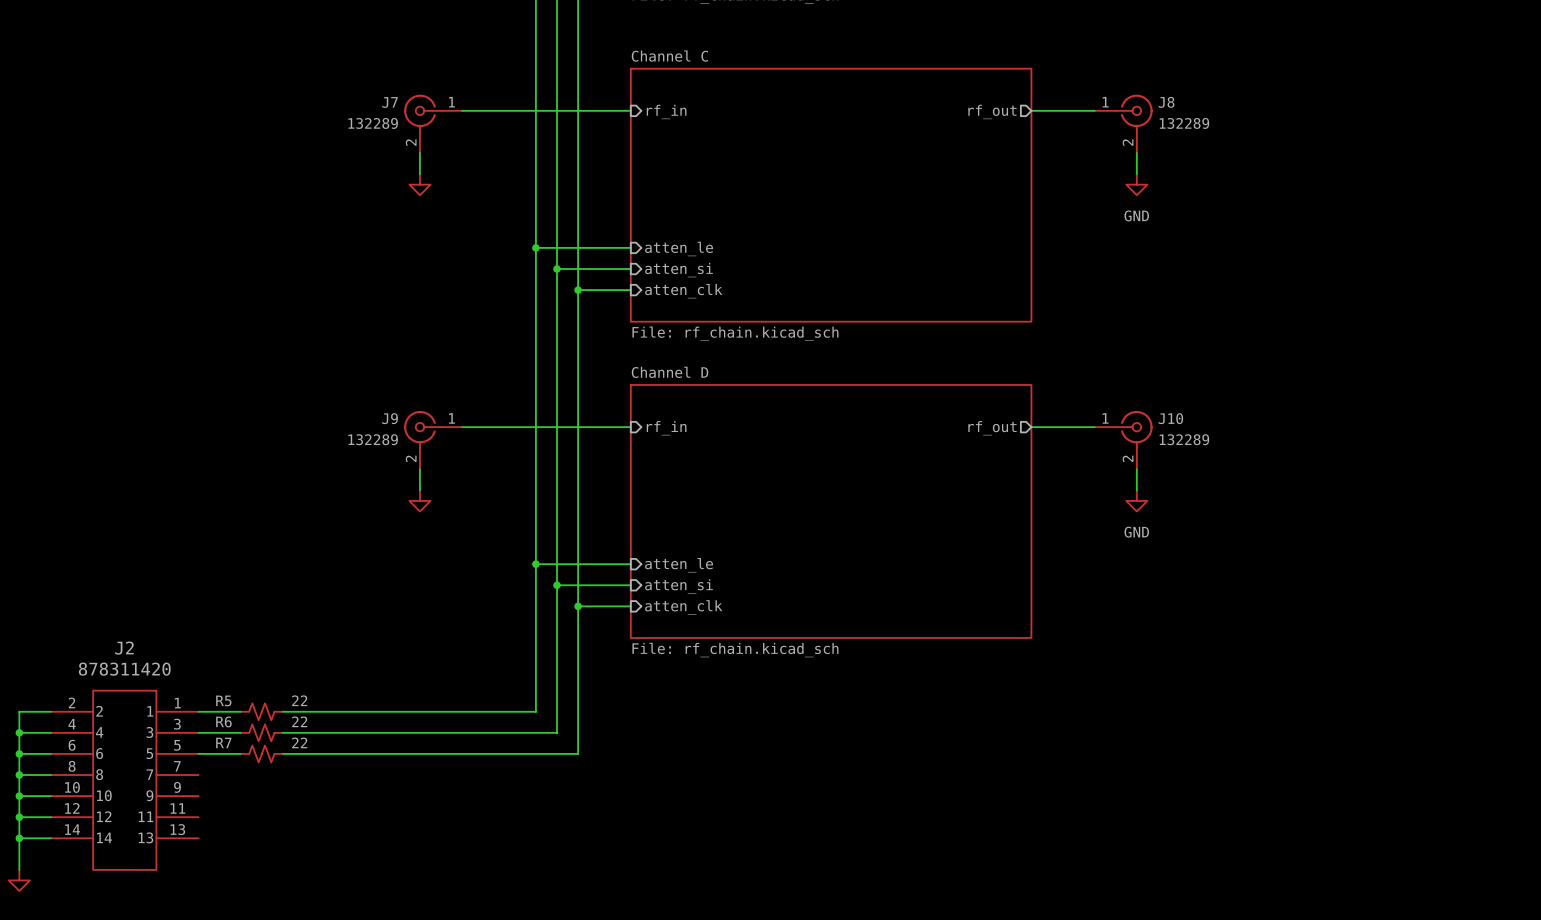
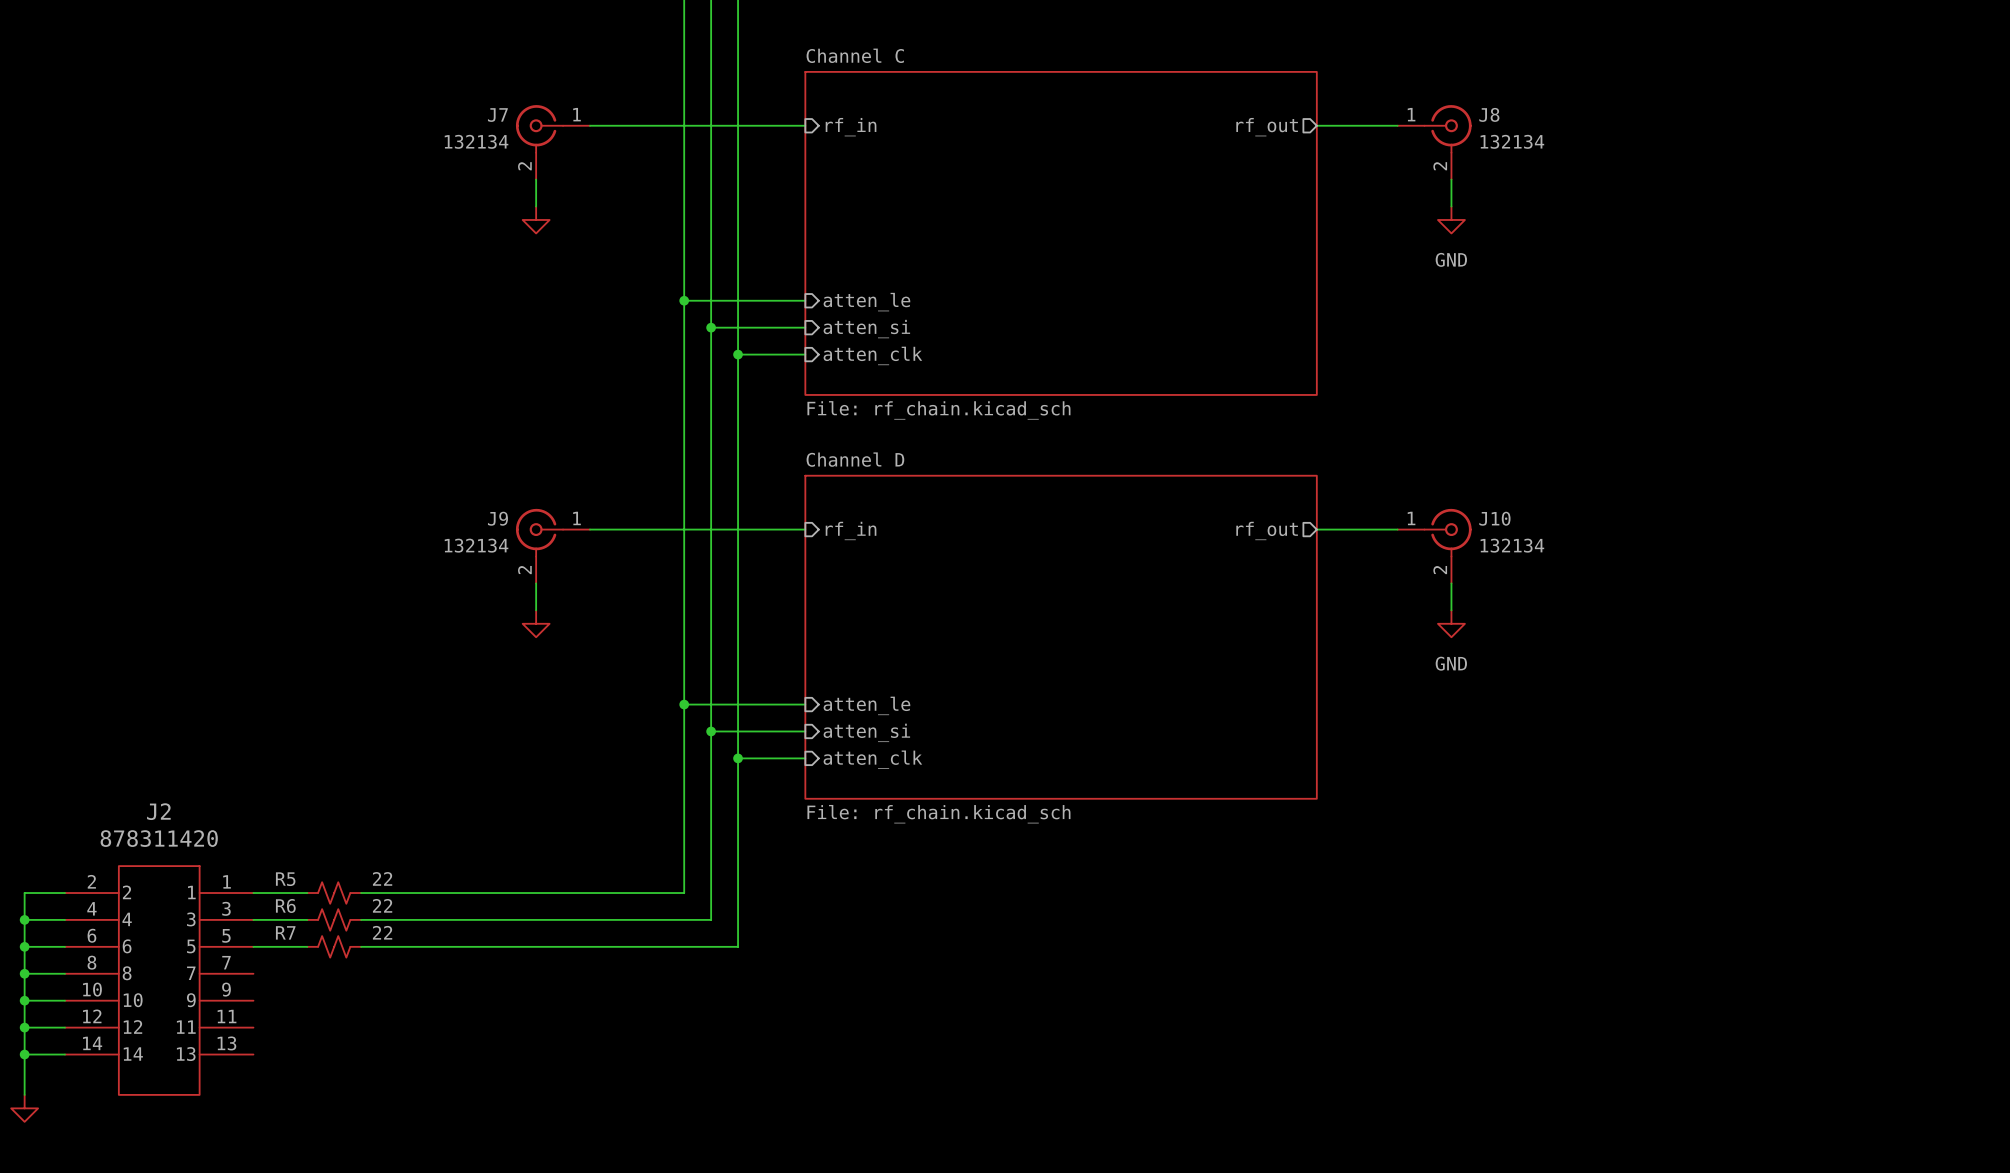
J7 value: 132289 (373, 123) -> 132134 (476, 141)
J8 value: 132289 (1184, 123) -> 132134 (1512, 141)
J9 value: 132289 (373, 439) -> 132134 (476, 545)
J10 value: 132289 (1184, 439) -> 132134 (1512, 545)

